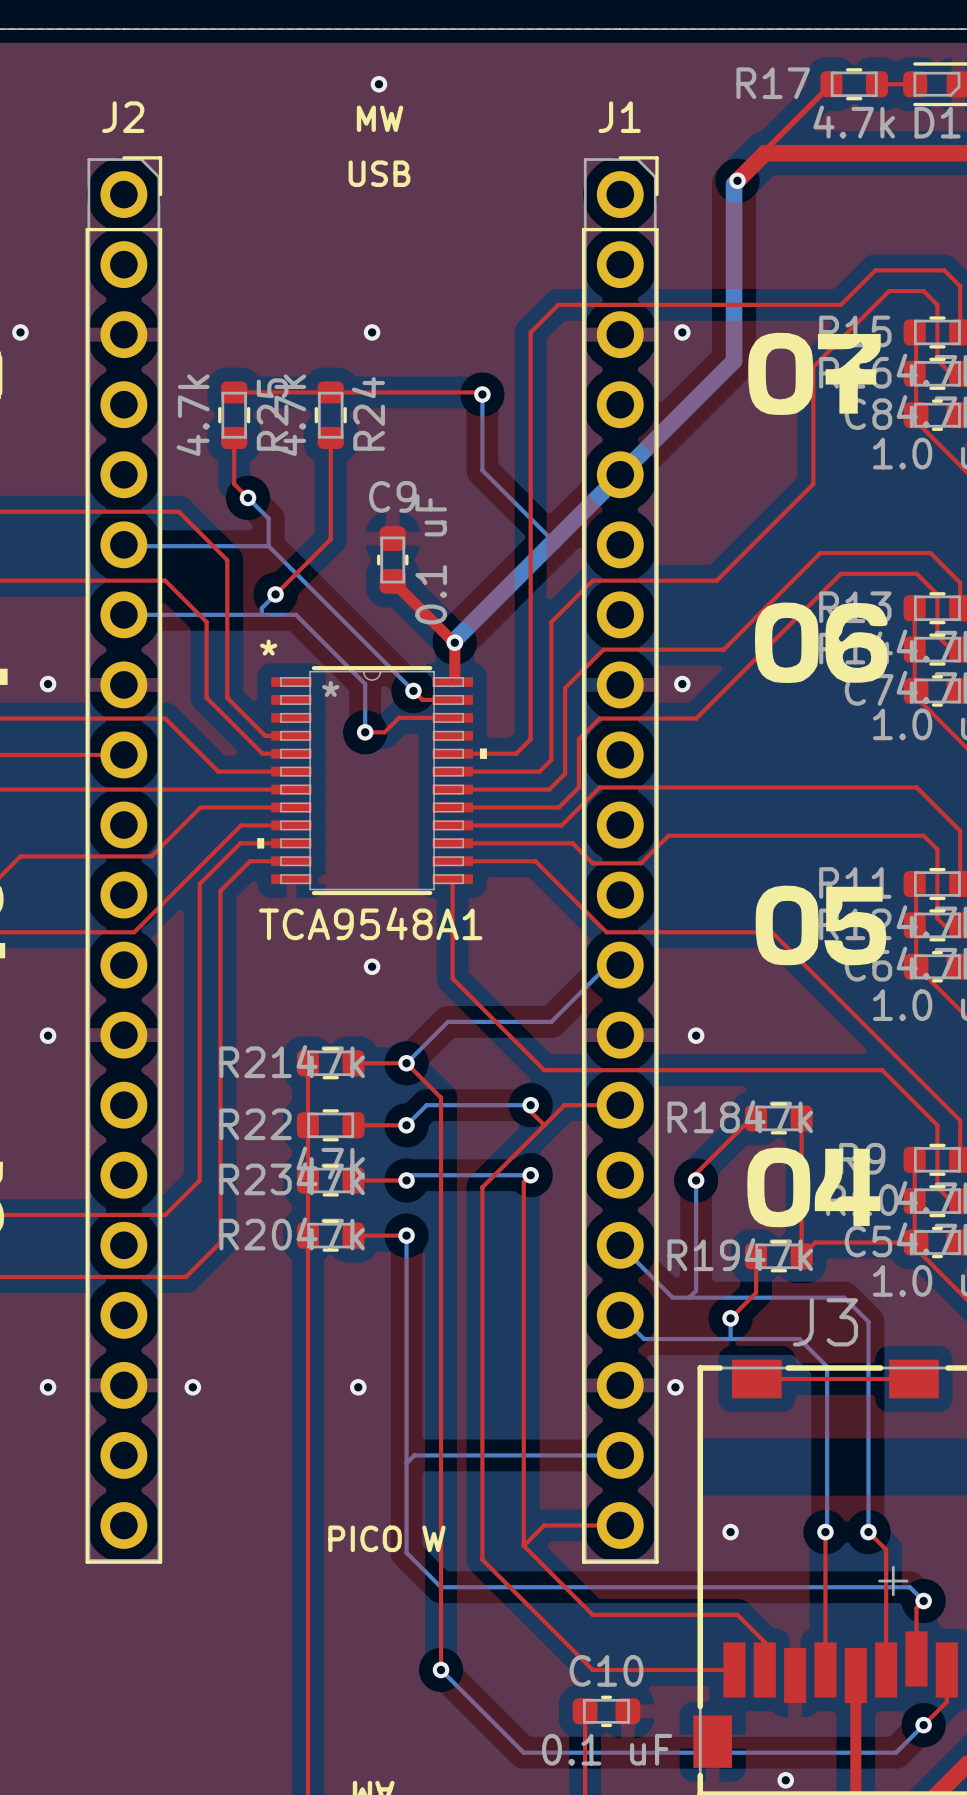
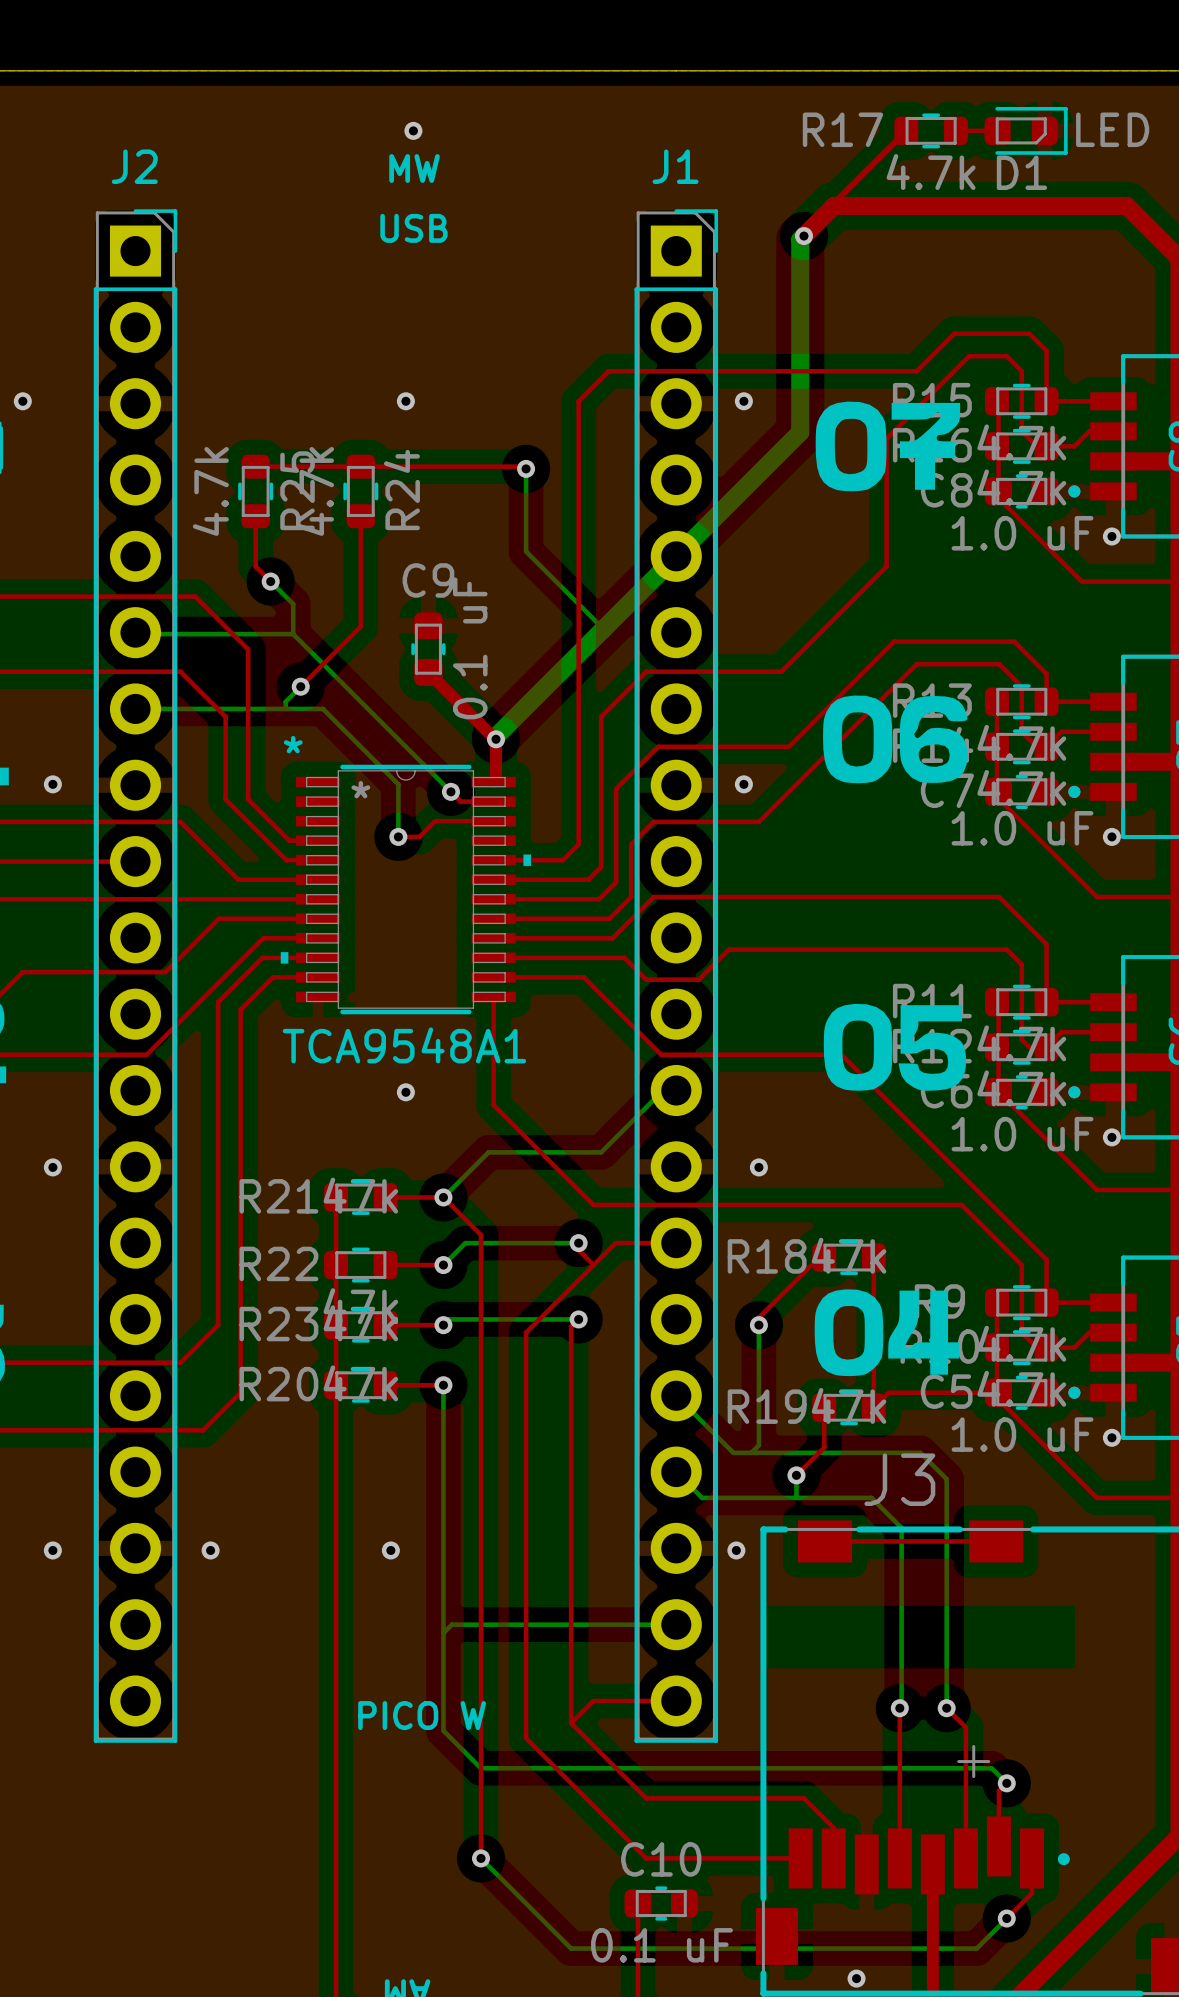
J2 footprint: [85, 156, 163, 1564] -> [93, 209, 178, 1743]
J1 footprint: [581, 156, 659, 1564] -> [634, 209, 719, 1743]
via: (730, 1532) -> none

